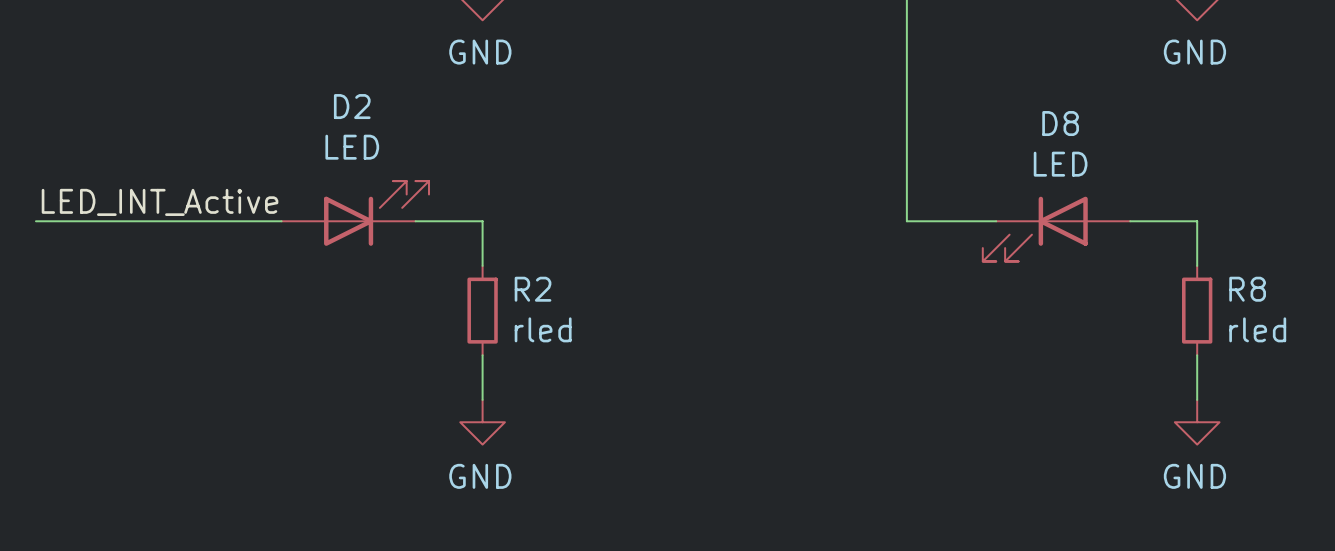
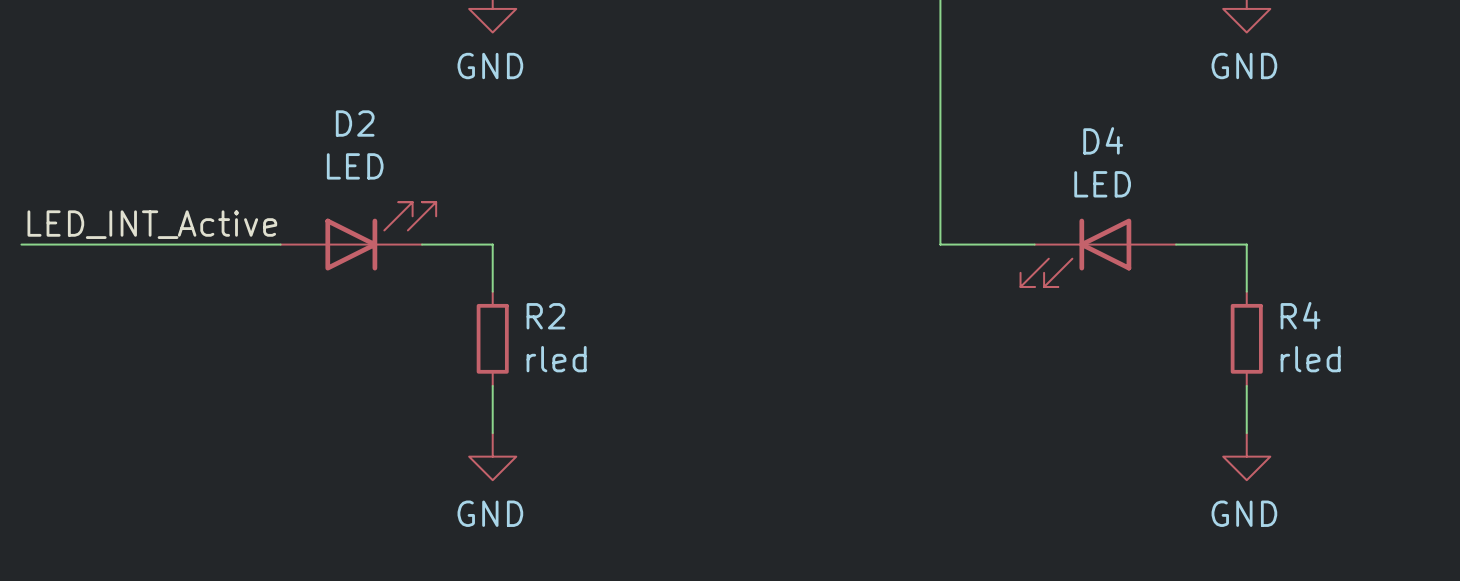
D8 name: D8 (1060, 123) -> D4 (1103, 140)
R8 name: R8 (1247, 289) -> R4 (1300, 315)

